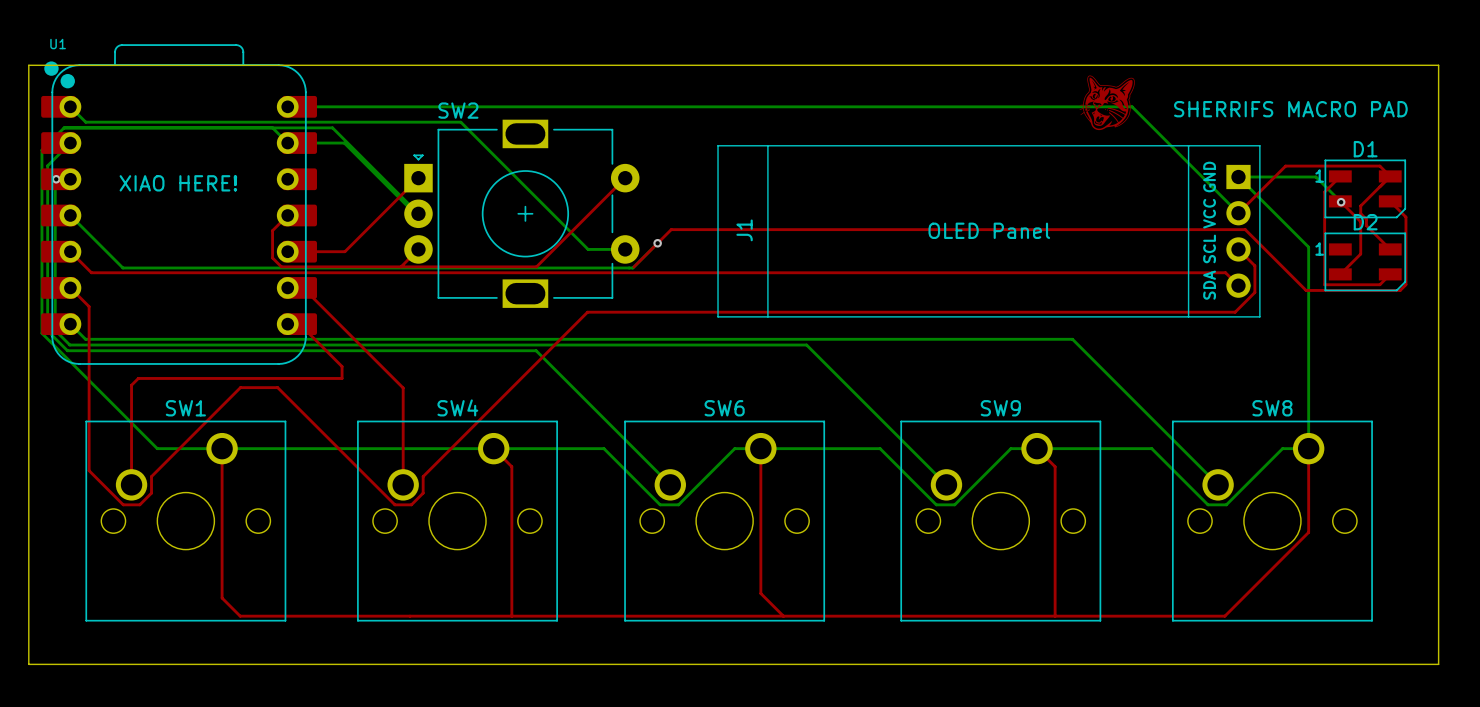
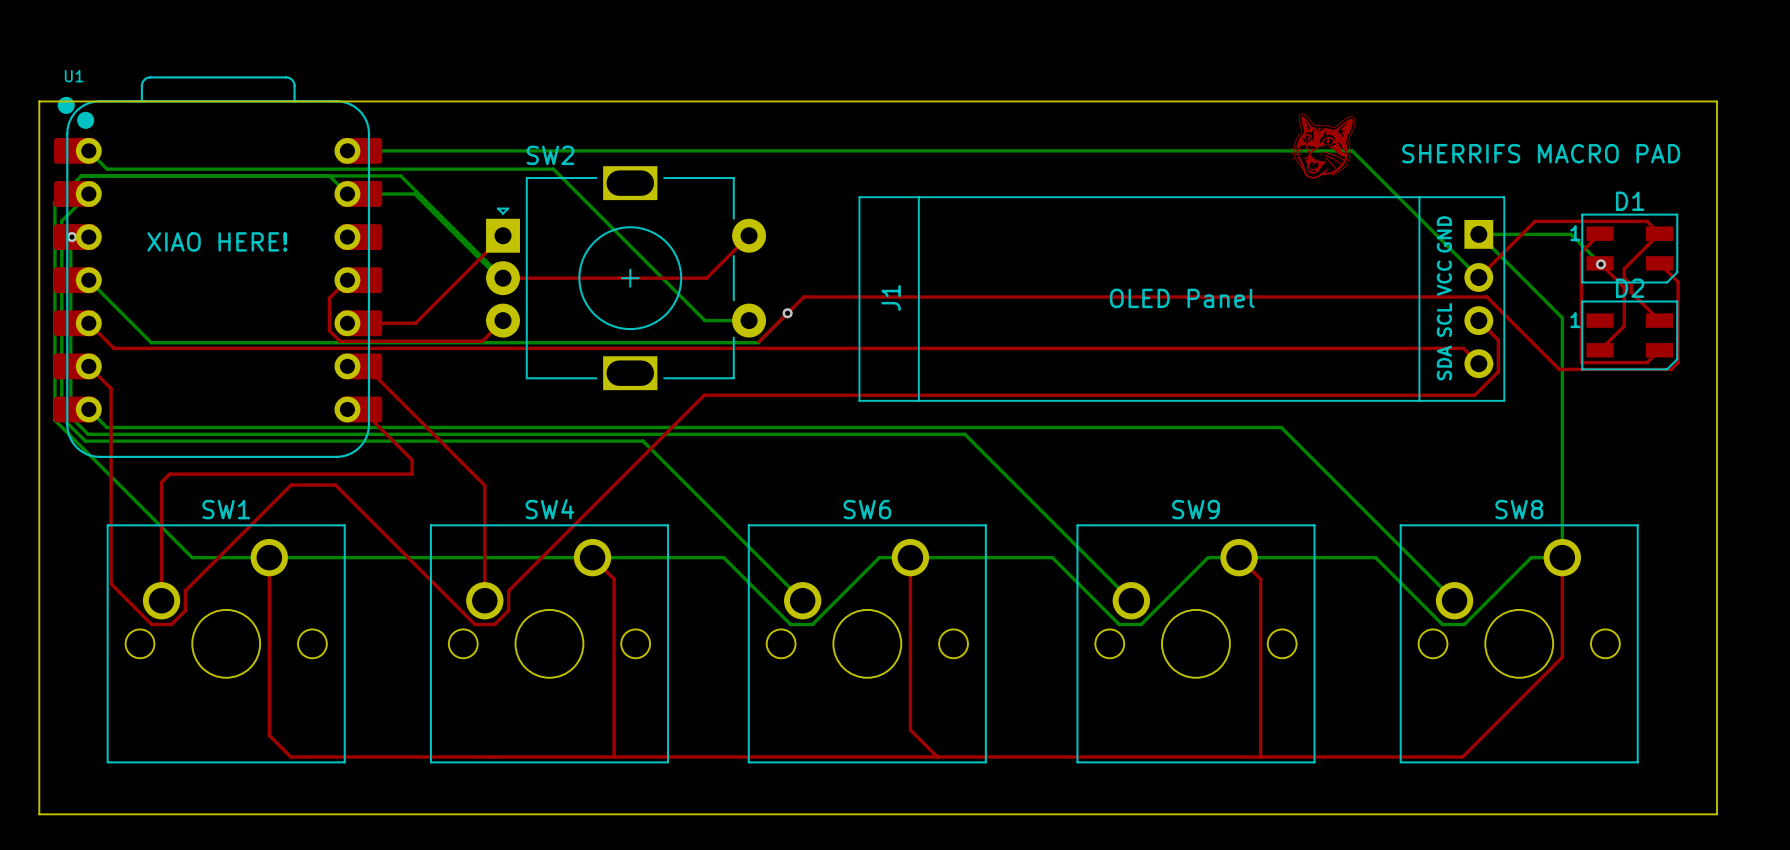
top track: (589, 213) (536, 266) (401, 266) -> (706, 278) (503, 278)

